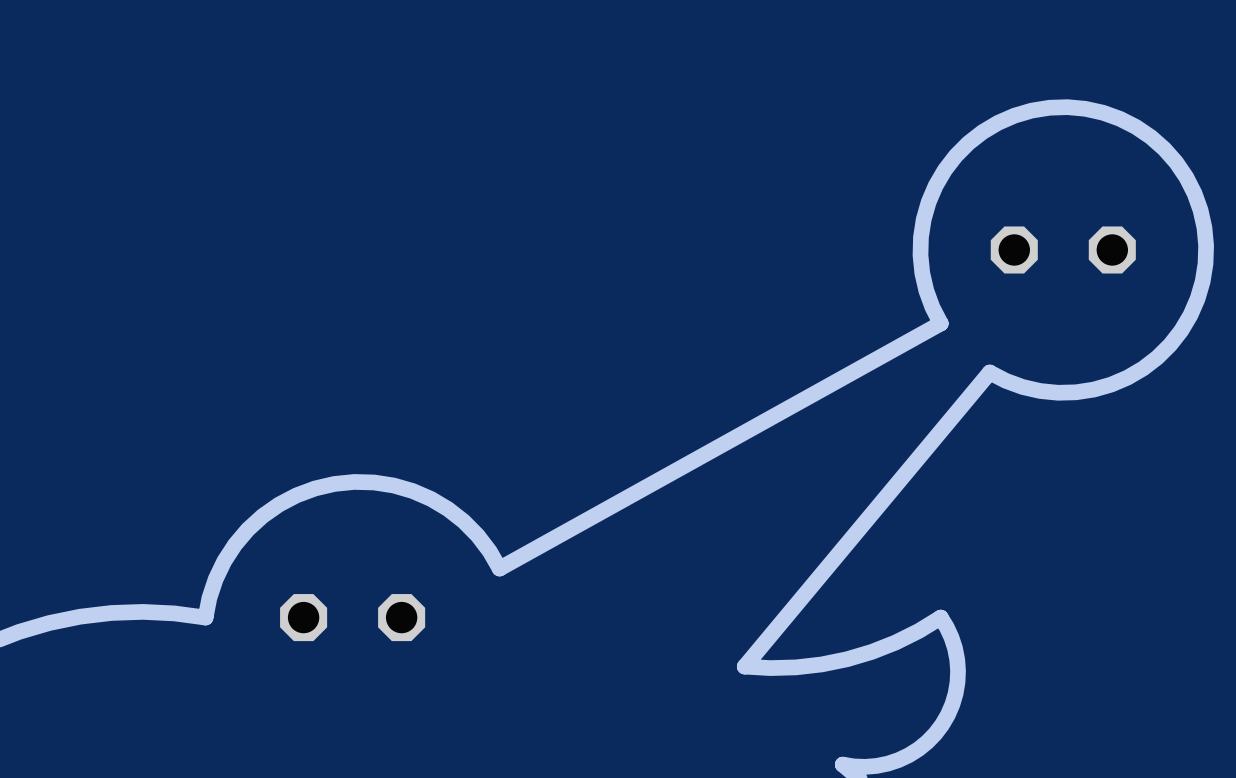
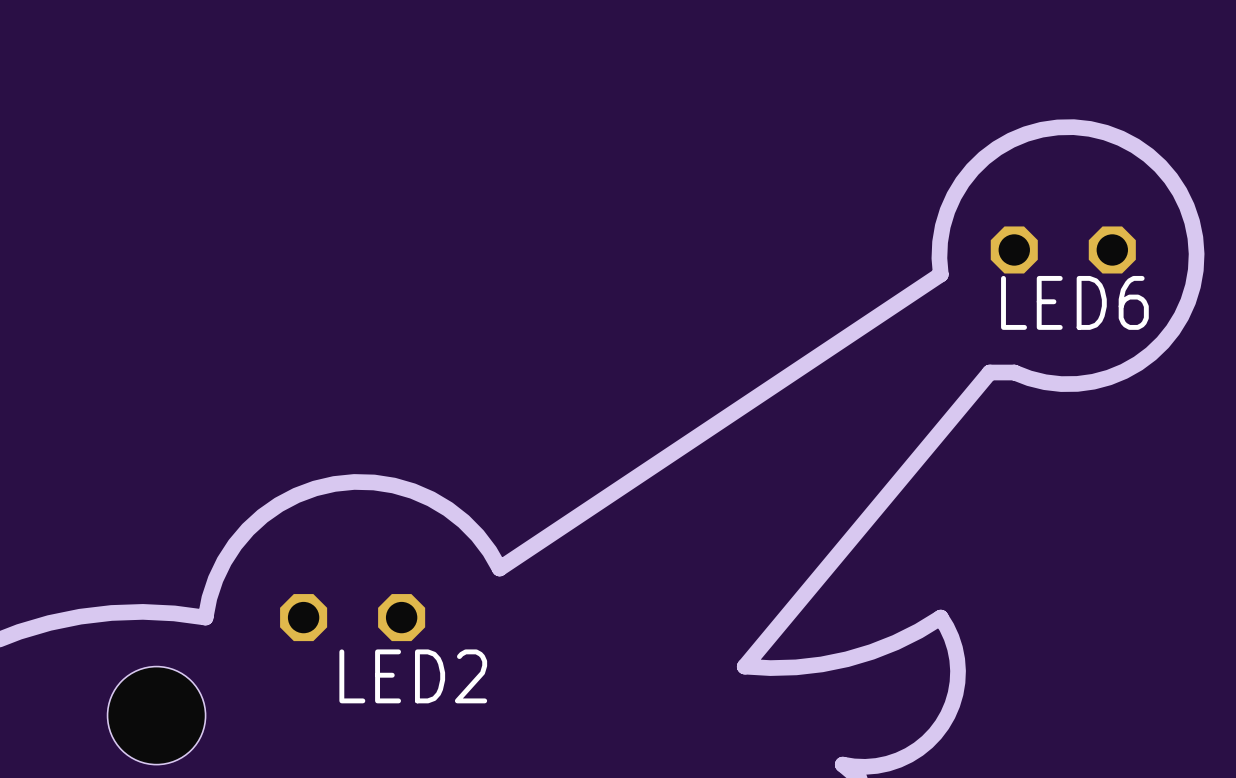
LED6 name: none -> LED6 (1074, 302)
board edge: (989, 372) (1022, 386) (1040, 390) (1058, 392) (1093, 389) (1111, 384) (1143, 368) (1170, 344) (1181, 330) (1197, 298) (1202, 281) (1206, 245) (1204, 227) (1194, 193) (1176, 162) (1164, 148) (1135, 126) (1103, 112) (1067, 107) (1031, 110) (1014, 115) (982, 132) (968, 143) (944, 170) (928, 202) (923, 219) (920, 255) (922, 273) (926, 290) (940, 323) (499, 568) -> (989, 372) (1014, 372) (1045, 382) (1061, 384) (1093, 381) (1109, 377) (1138, 363) (1162, 342) (1172, 329) (1188, 301) (1192, 285) (1195, 270) (1195, 237) (1186, 206) (1179, 192) (1160, 166) (1135, 145) (1105, 132) (1089, 128) (1057, 127) (1026, 134) (997, 148) (972, 169) (954, 195) (947, 210) (940, 242) (940, 274) (499, 568)
LED2 name: none -> LED2 (413, 676)
hole: none -> (156, 715)

